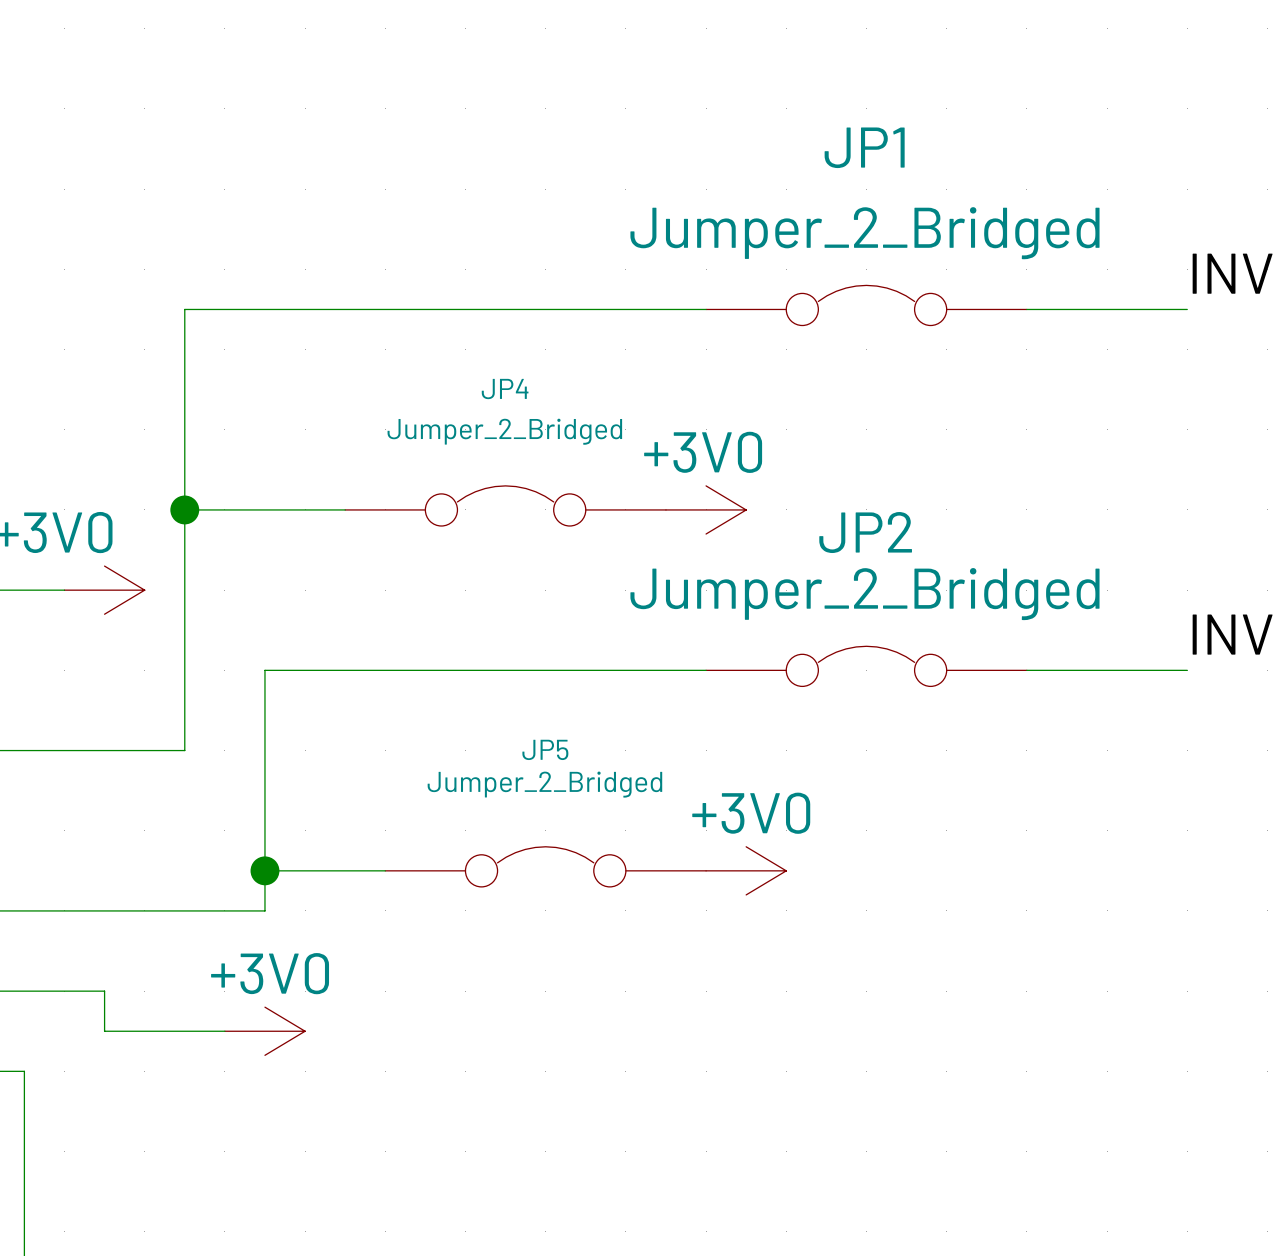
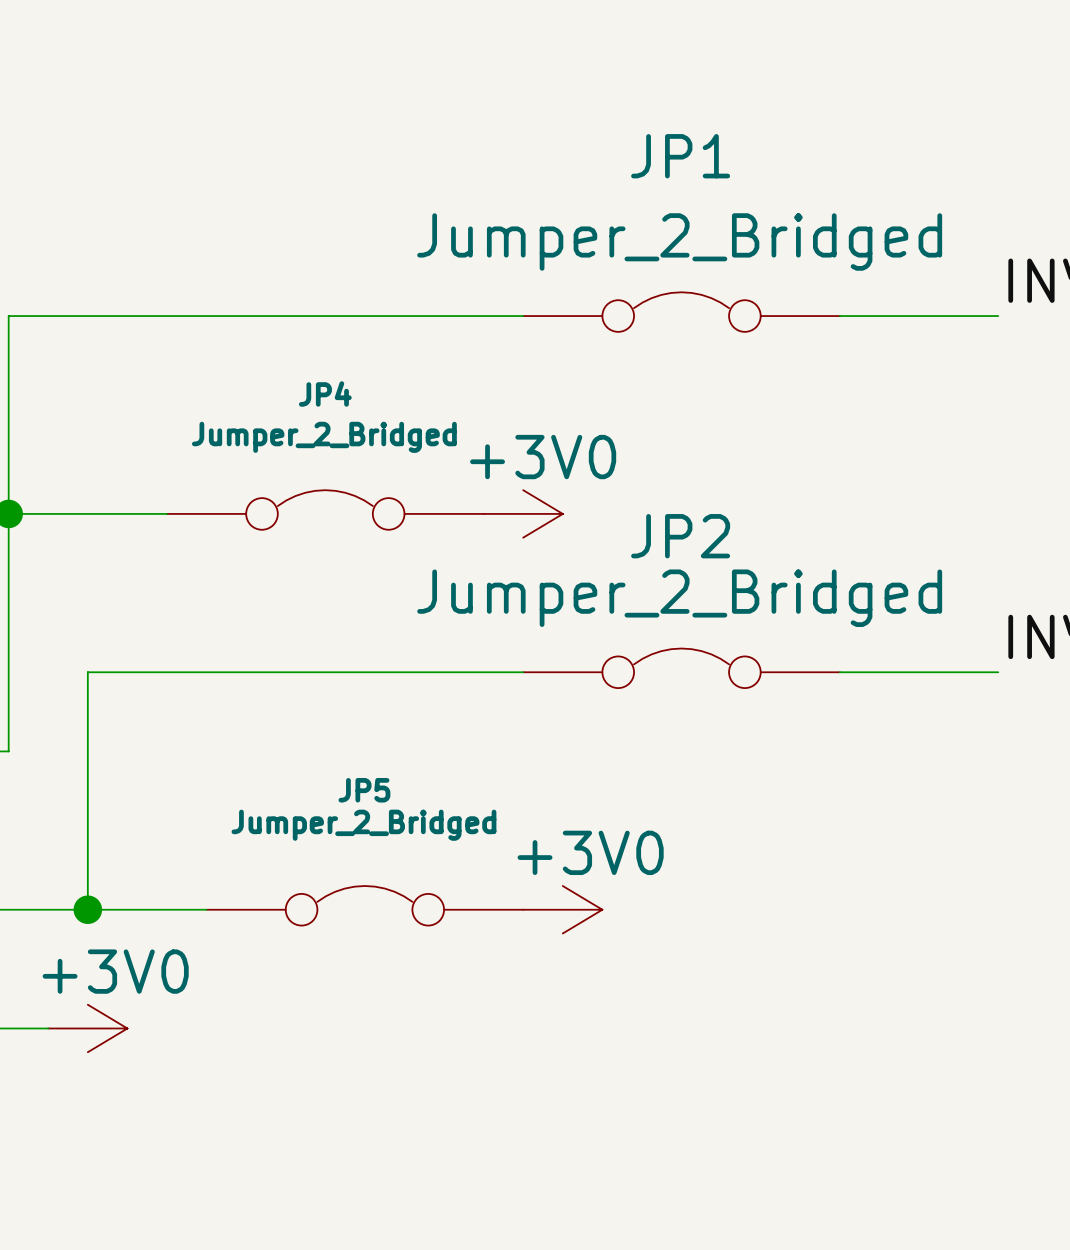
JP5 position: (545, 866) -> (364, 905)
wire: (264, 870) (385, 870) -> (87, 909) (206, 909)
junction position: (264, 870) -> (87, 909)
power symbol position: +3V0 (746, 870) -> +3V0 (562, 909)

